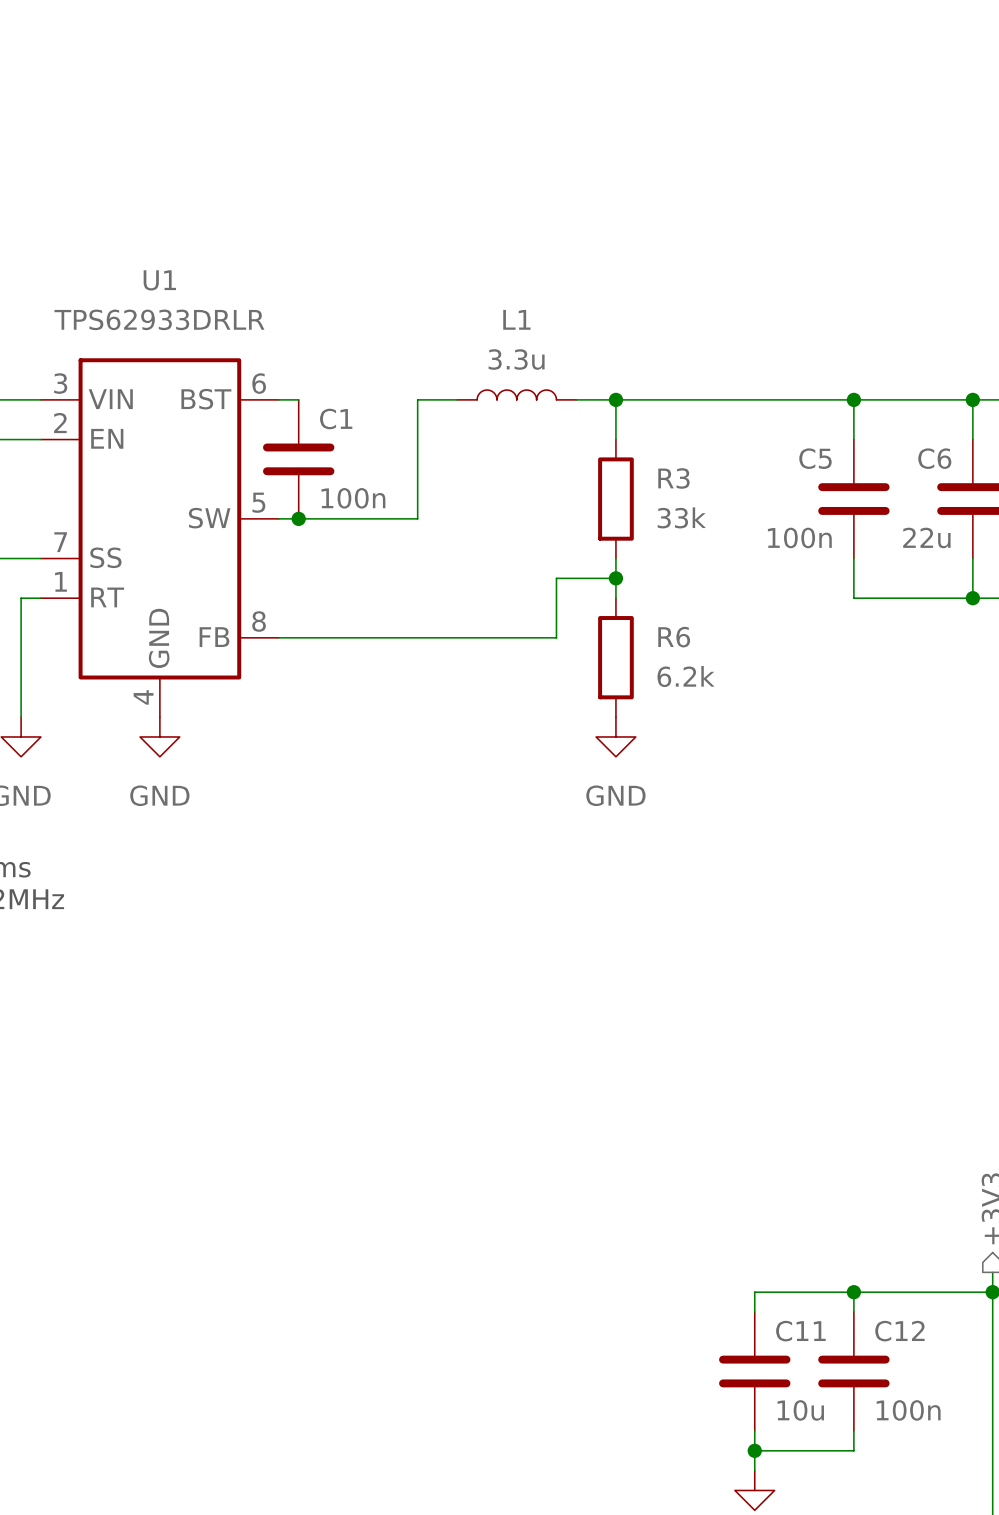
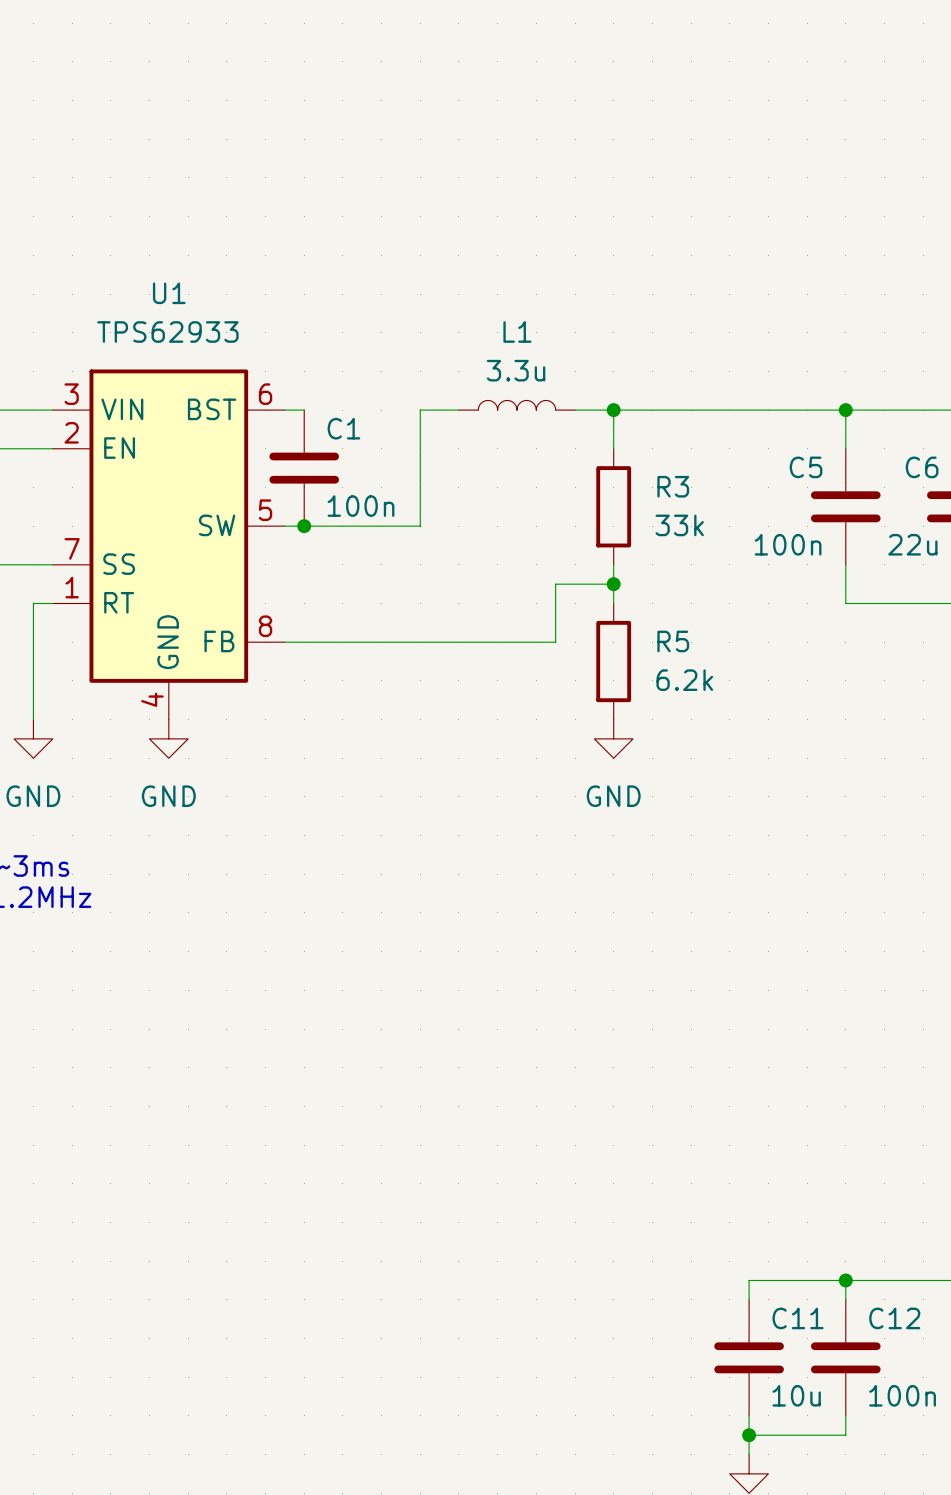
U1 value: TPS62933DRLR (159, 319) -> TPS62933 (167, 331)
R6 name: R6 (674, 637) -> R5 (673, 641)

